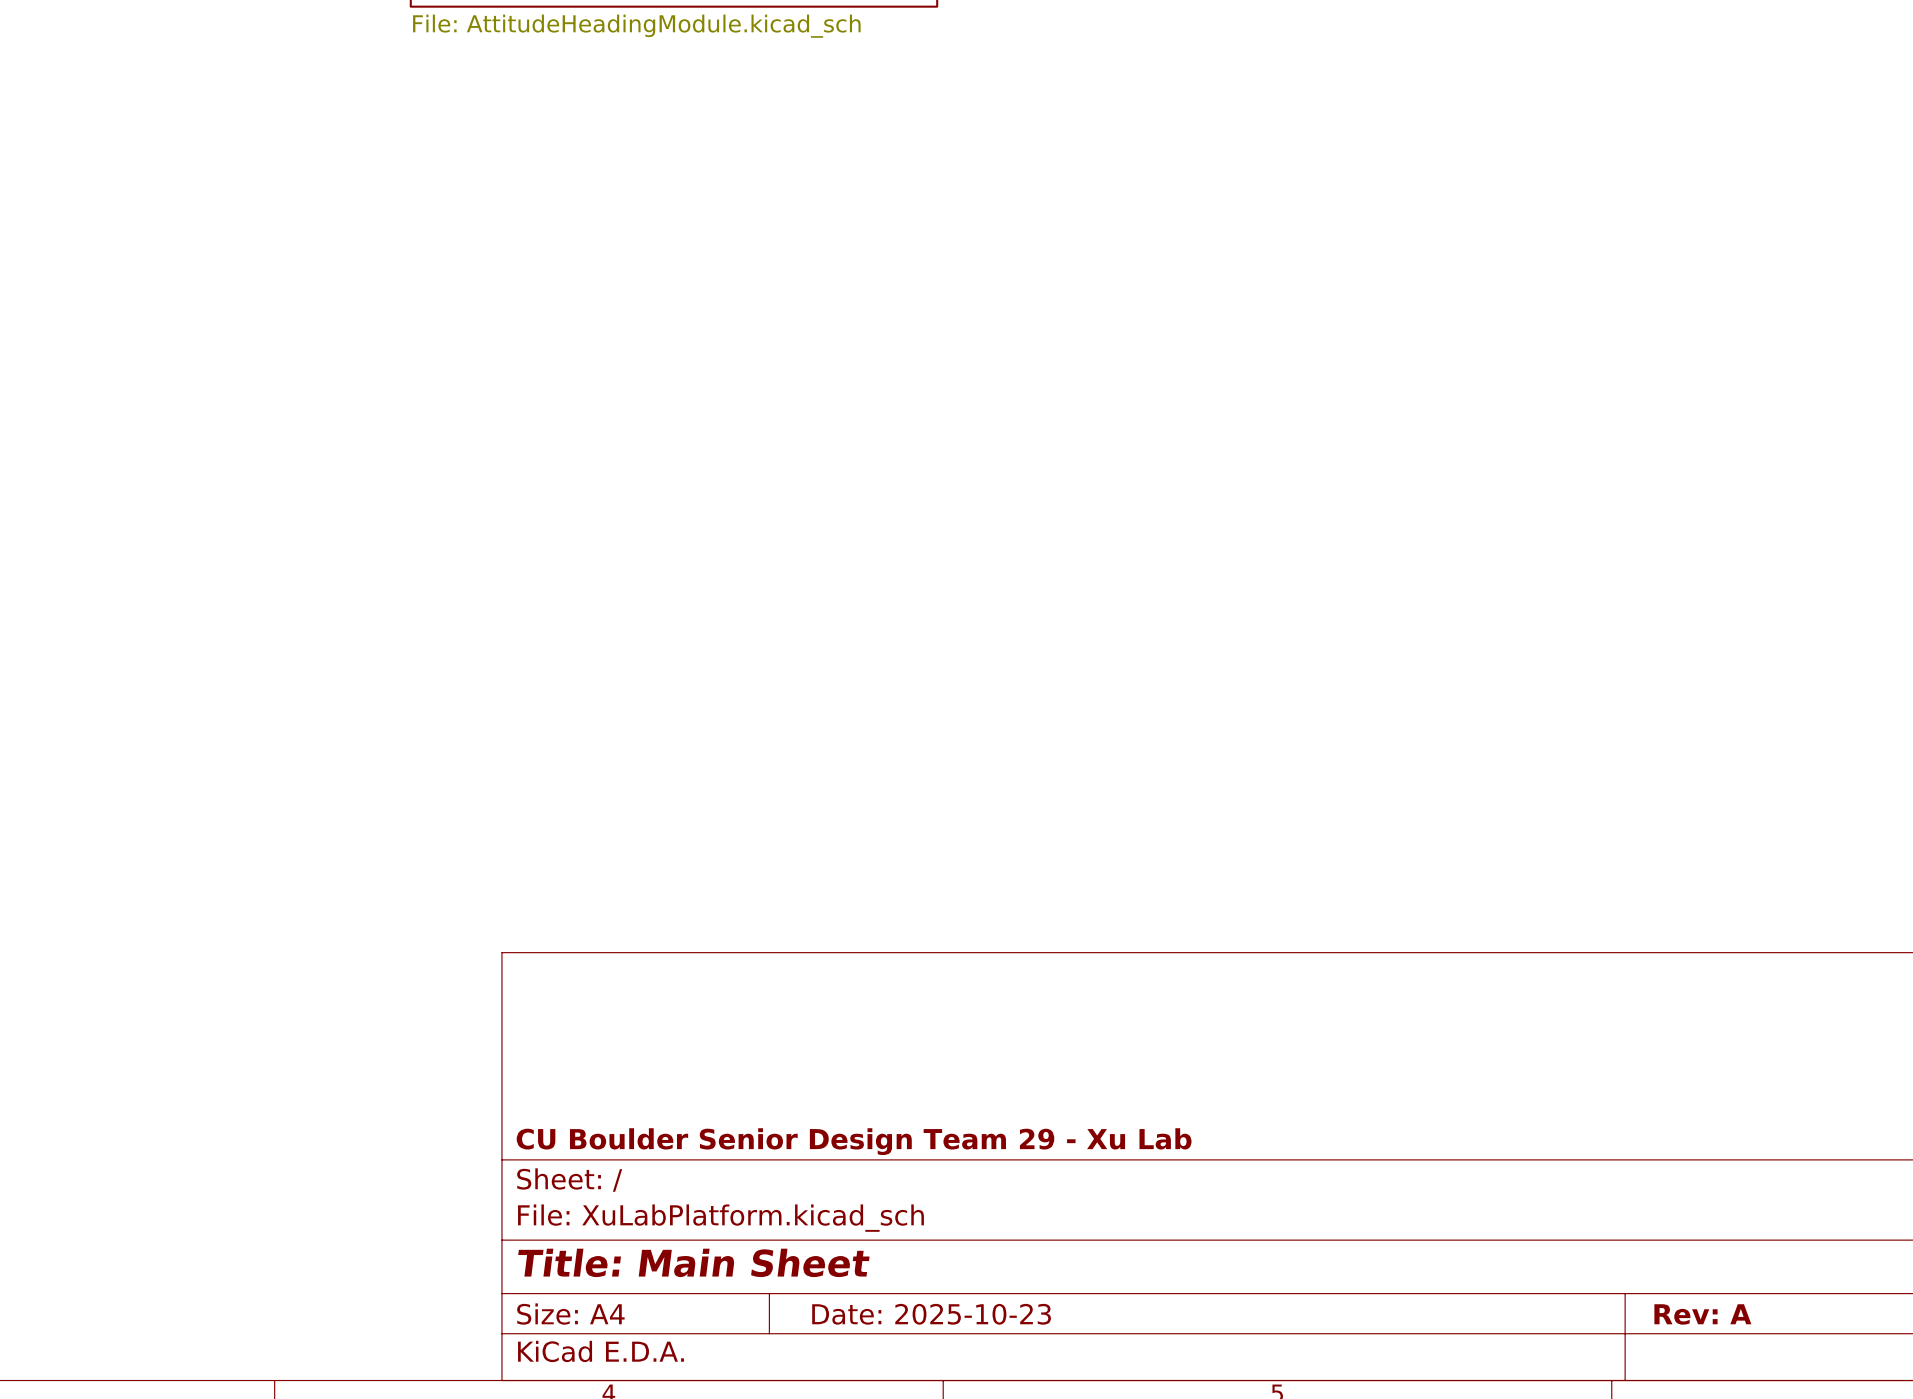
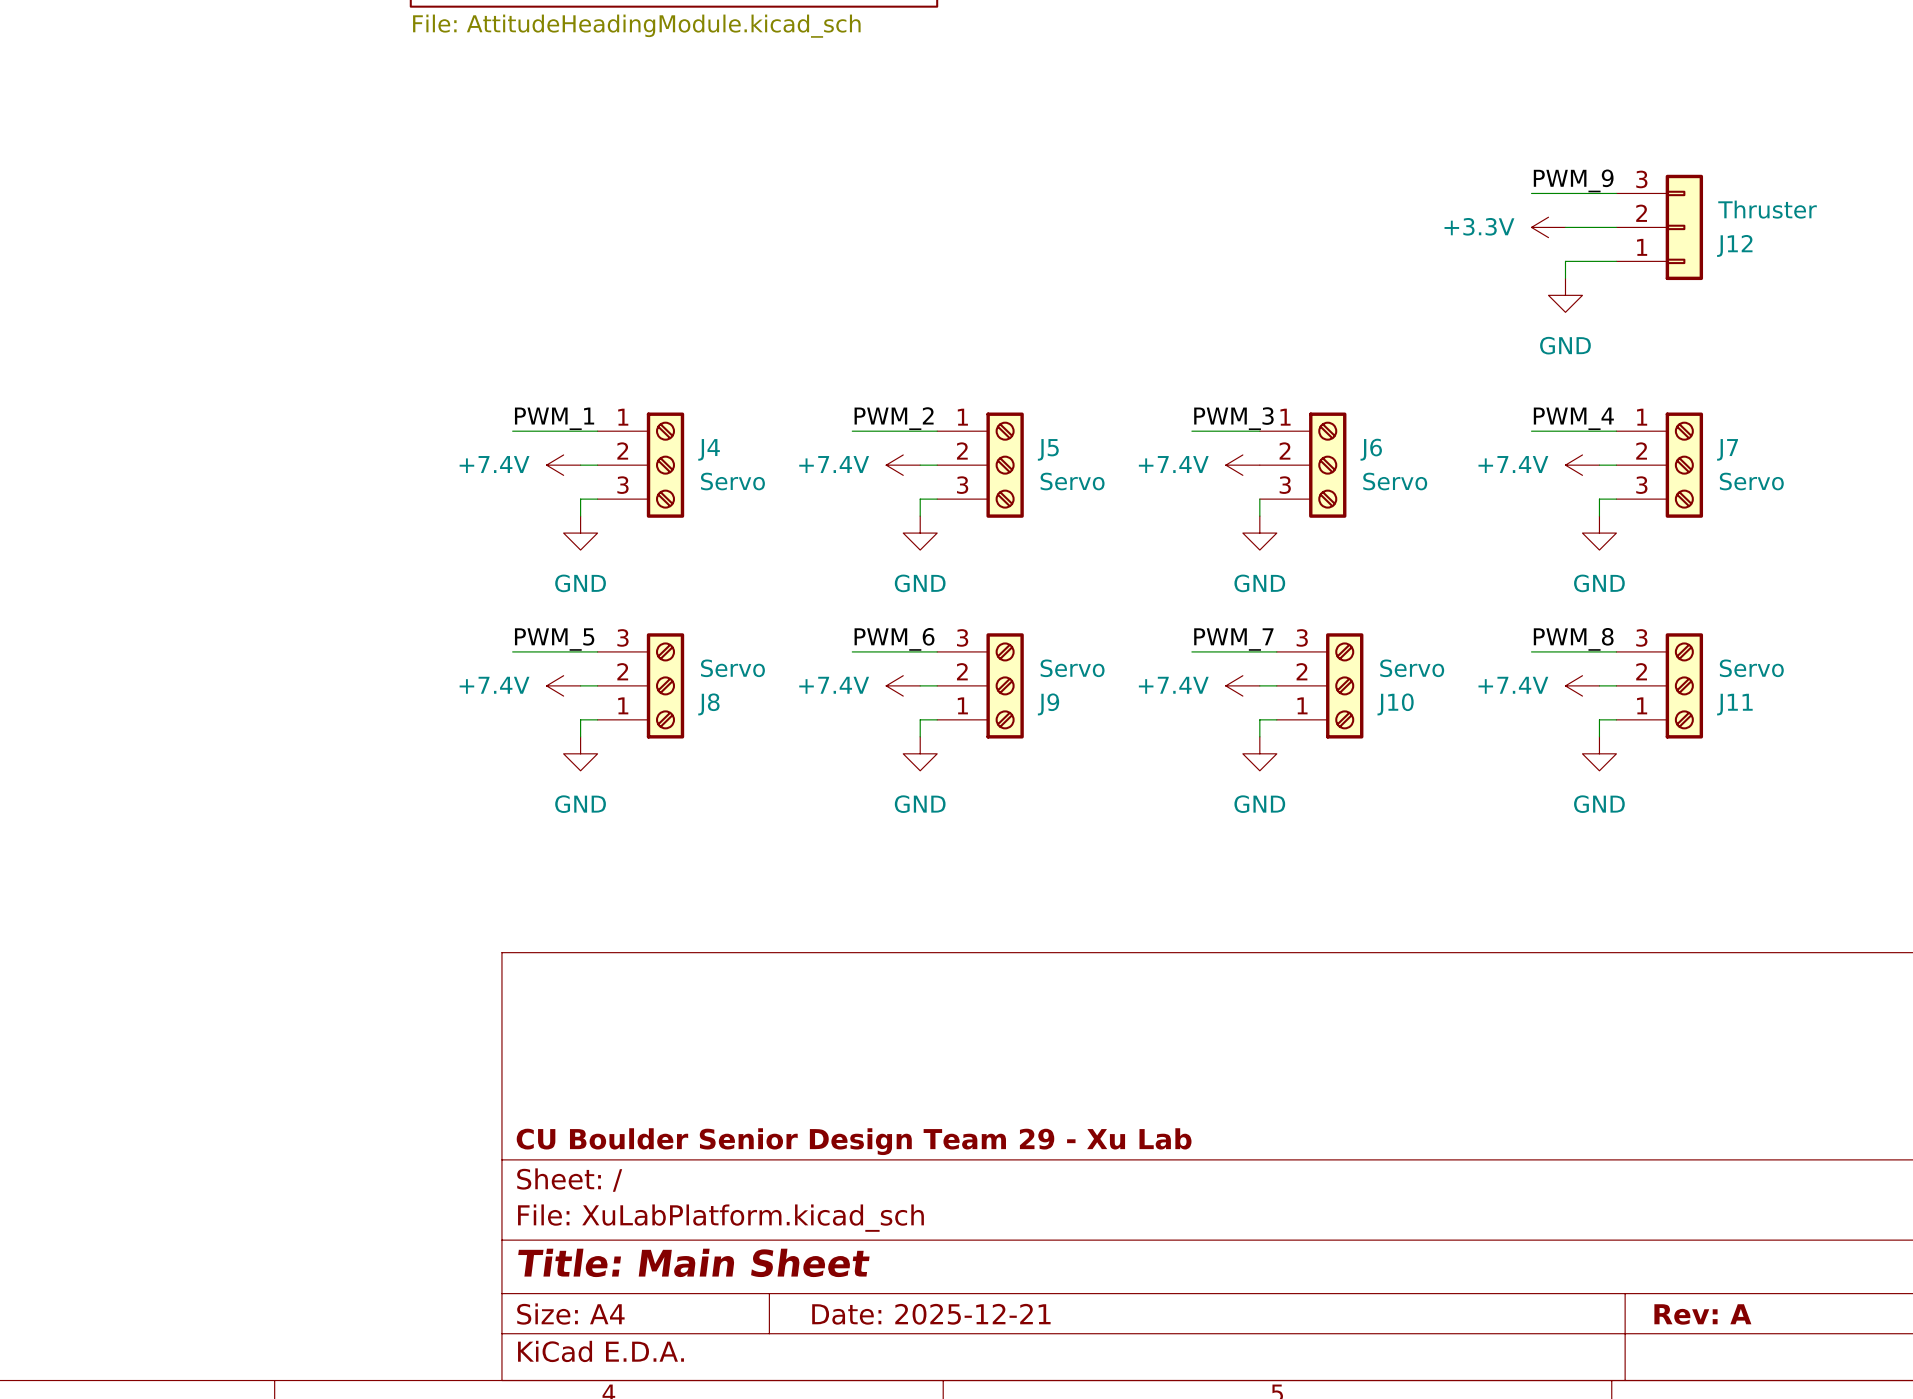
label: none -> PWM_9 (1573, 180)
wire: none -> (1531, 193) (1616, 193)
power symbol: none -> +3.3V (1548, 227)
wire: none -> (1565, 227) (1616, 227)
J12: none -> Thruster (1659, 227)
wire: none -> (1616, 261) (1565, 261) (1565, 278)
power symbol: none -> GND (1565, 295)
label: none -> PWM_1 (554, 418)
label: none -> PWM_2 (894, 418)
label: none -> PWM_3 (1233, 418)
label: none -> PWM_4 (1573, 418)
wire: none -> (512, 431) (597, 431)
wire: none -> (852, 431) (937, 431)
wire: none -> (1191, 431) (1259, 431)
wire: none -> (1531, 431) (1616, 431)
power symbol: none -> +7.4V (563, 465)
wire: none -> (580, 465) (597, 465)
J4: none -> Servo (640, 465)
power symbol: none -> +7.4V (903, 465)
wire: none -> (920, 465) (937, 465)
J5: none -> Servo (980, 465)
power symbol: none -> +7.4V (1242, 465)
J6: none -> Servo (1303, 465)
power symbol: none -> +7.4V (1582, 465)
wire: none -> (1599, 465) (1616, 465)
J7: none -> Servo (1659, 465)
wire: none -> (597, 499) (580, 499) (580, 516)
wire: none -> (937, 499) (920, 499) (920, 516)
wire: none -> (1259, 499) (1259, 516)
wire: none -> (1616, 499) (1599, 499) (1599, 516)
power symbol: none -> GND (580, 533)
power symbol: none -> GND (920, 533)
power symbol: none -> GND (1259, 533)
power symbol: none -> GND (1599, 533)
label: none -> PWM_5 (554, 639)
label: none -> PWM_6 (894, 639)
label: none -> PWM_7 (1233, 639)
label: none -> PWM_8 (1573, 639)
wire: none -> (512, 651) (597, 651)
wire: none -> (852, 651) (937, 651)
wire: none -> (1191, 651) (1276, 651)
wire: none -> (1531, 651) (1616, 651)
power symbol: none -> +7.4V (563, 685)
wire: none -> (580, 685) (597, 685)
J8: none -> Servo (640, 685)
power symbol: none -> +7.4V (903, 685)
wire: none -> (920, 685) (937, 685)
J9: none -> Servo (980, 685)
power symbol: none -> +7.4V (1242, 685)
wire: none -> (1259, 685) (1276, 685)
J10: none -> Servo (1320, 685)
power symbol: none -> +7.4V (1582, 685)
wire: none -> (1599, 685) (1616, 685)
J11: none -> Servo (1659, 685)
wire: none -> (597, 719) (580, 719) (580, 736)
wire: none -> (937, 719) (920, 719) (920, 736)
wire: none -> (1276, 719) (1259, 719) (1259, 736)
wire: none -> (1616, 719) (1599, 719) (1599, 736)
power symbol: none -> GND (580, 753)
power symbol: none -> GND (920, 753)
power symbol: none -> GND (1259, 753)
power symbol: none -> GND (1599, 753)
title block: Date: 2025-10-23 (931, 1314) -> Date: 2025-12-21 (931, 1314)

